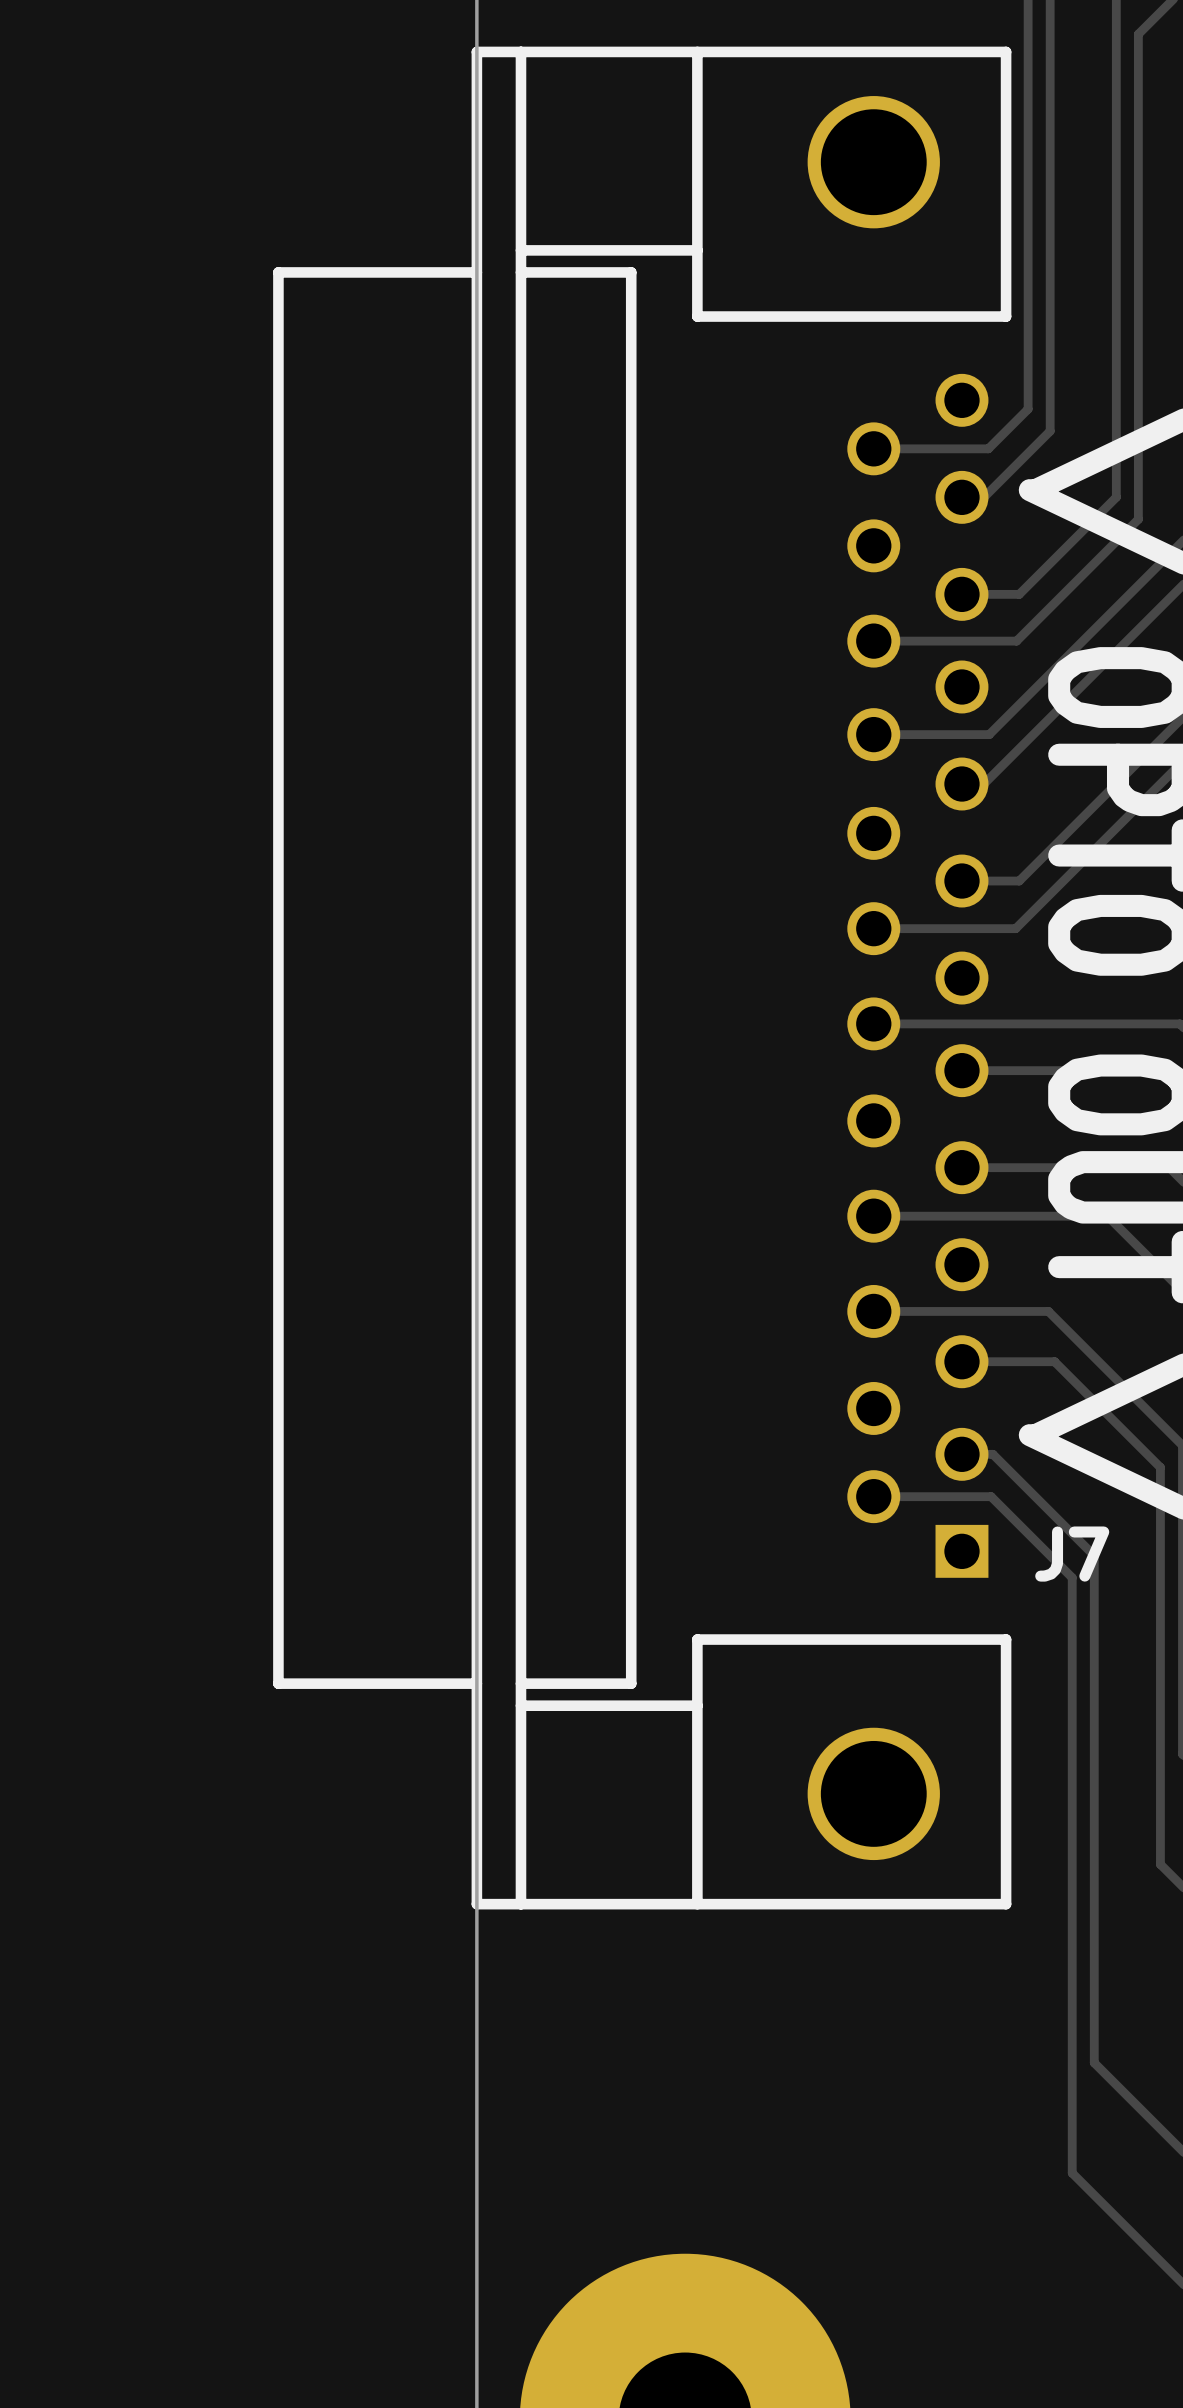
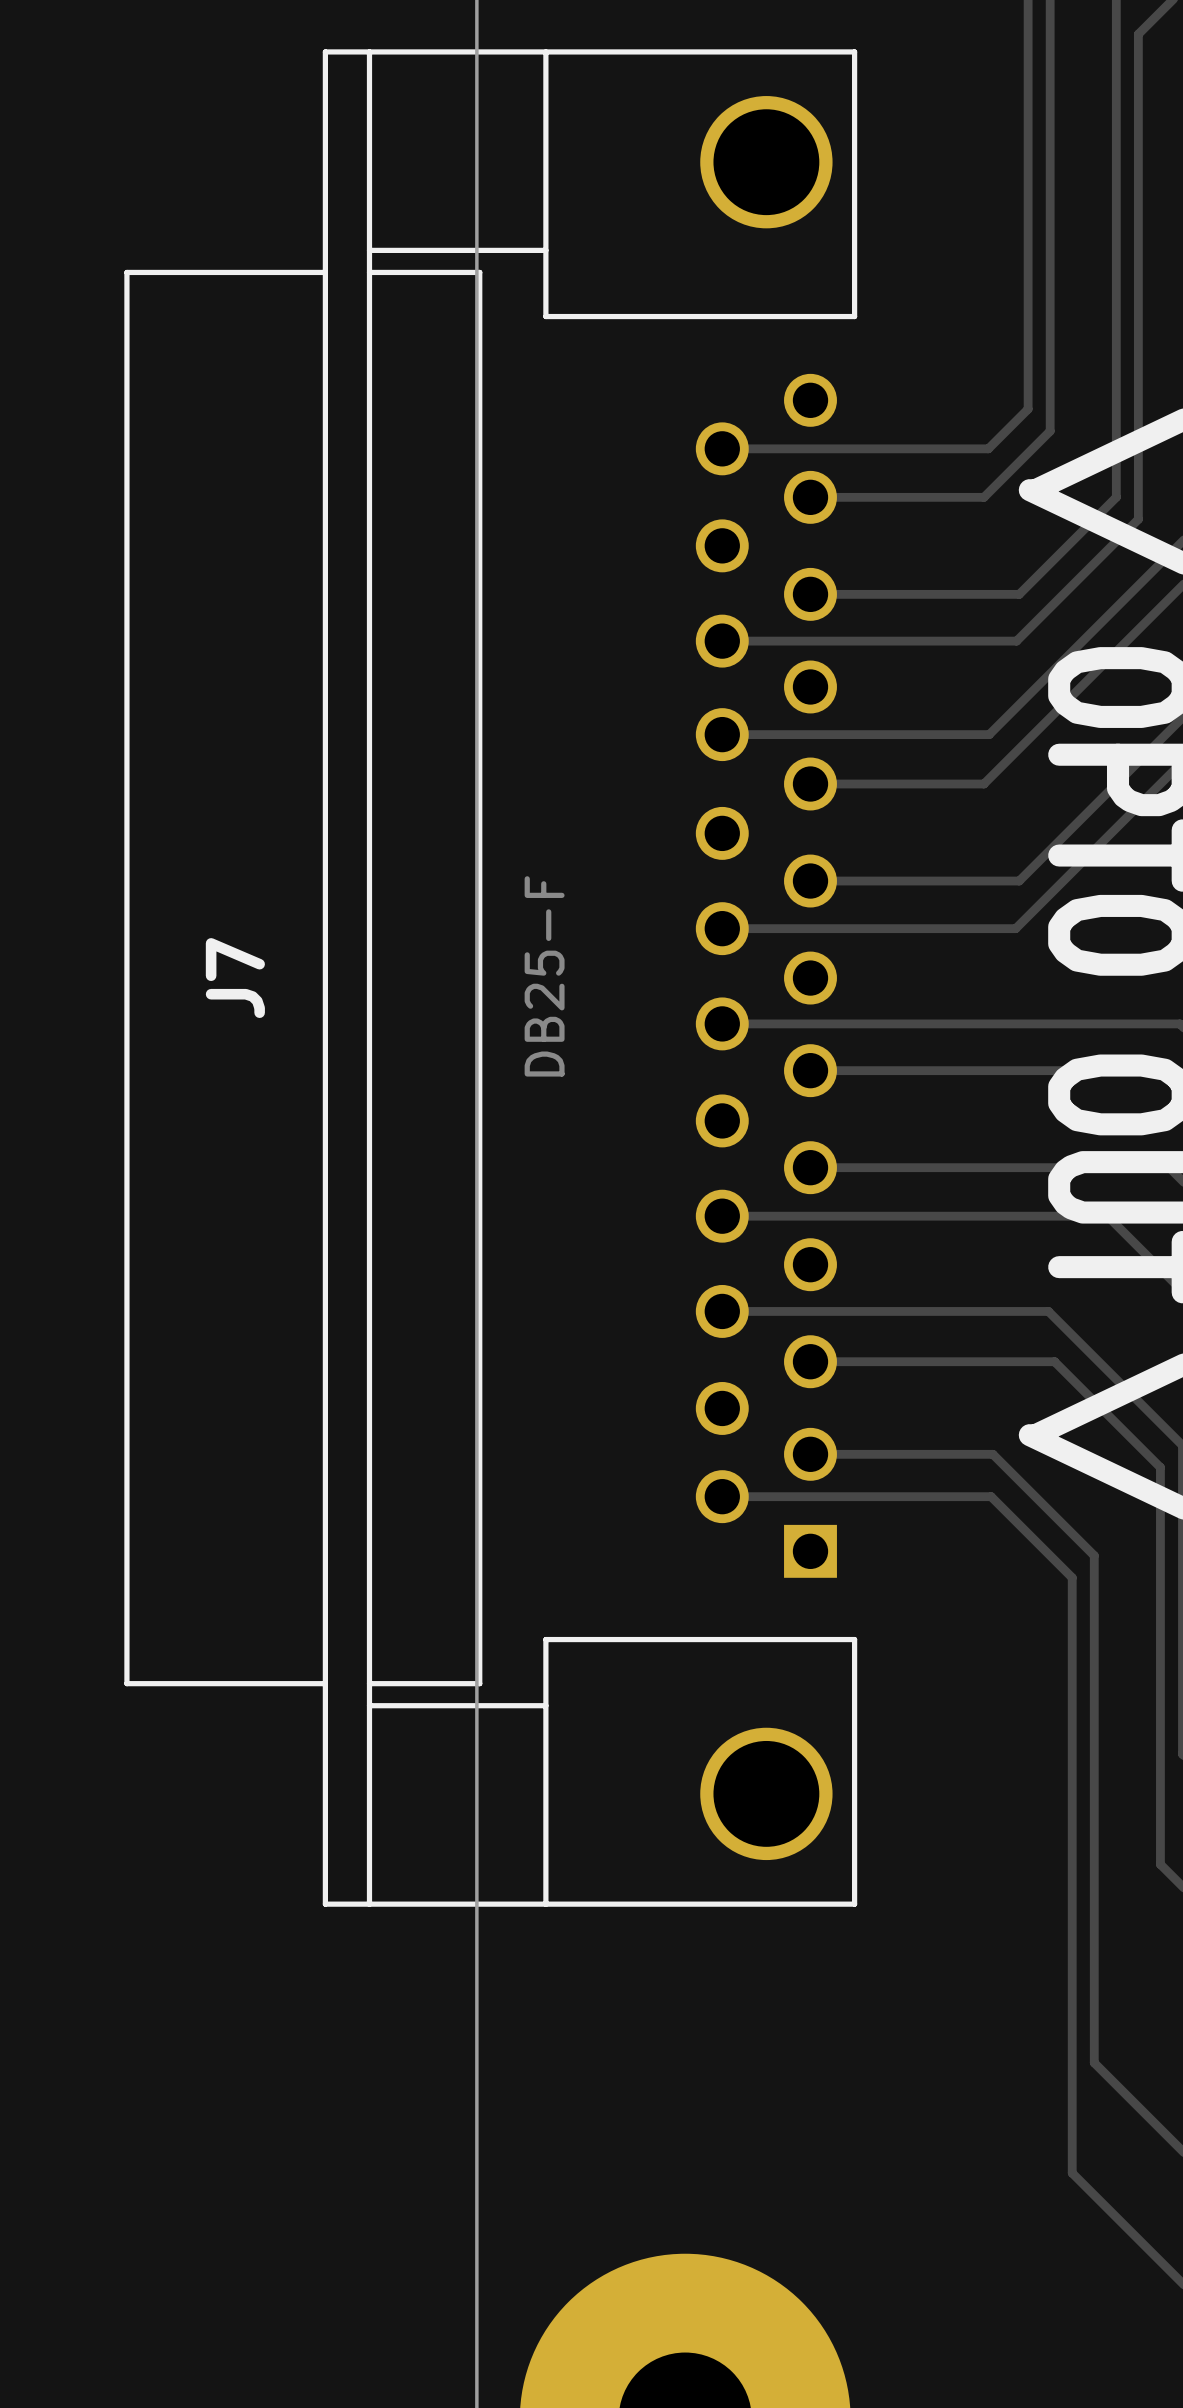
J7 footprint: [273, 46, 1012, 1910] -> [124, 49, 858, 1907]
track: none -> (722, 448) (873, 448)
track: none -> (810, 497) (961, 497)
track: none -> (810, 594) (961, 594)
track: none -> (722, 641) (873, 641)
track: none -> (722, 734) (873, 734)
track: none -> (810, 784) (961, 784)
track: none -> (810, 881) (961, 881)
track: none -> (722, 928) (873, 928)
J7 value: none -> DB25-F (544, 976)
track: none -> (722, 1023) (873, 1023)
track: none -> (810, 1070) (961, 1070)
track: none -> (810, 1167) (961, 1167)
track: none -> (722, 1216) (873, 1216)
track: none -> (722, 1311) (873, 1311)
track: none -> (810, 1361) (961, 1361)
track: none -> (810, 1454) (961, 1454)
track: none -> (722, 1496) (873, 1496)
J7 name position: J7 (1072, 1554) -> J7 (235, 978)

